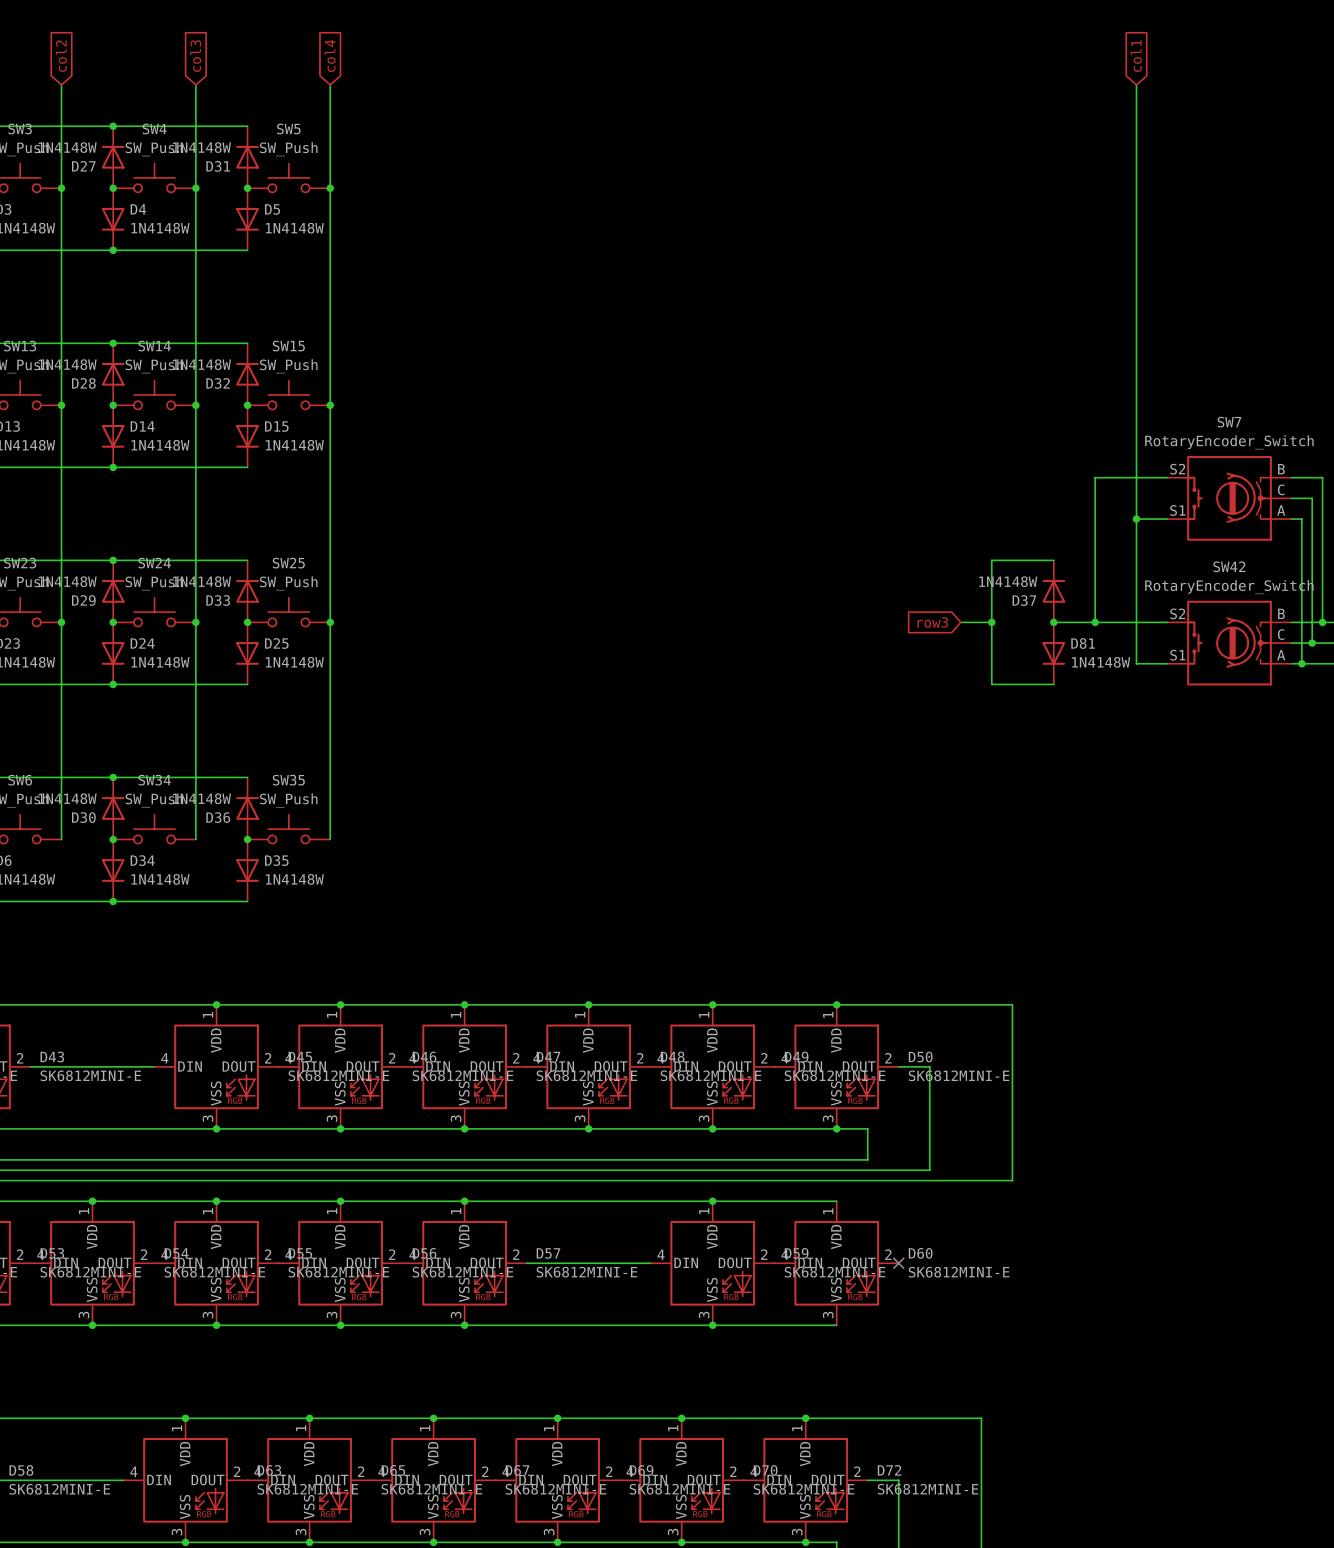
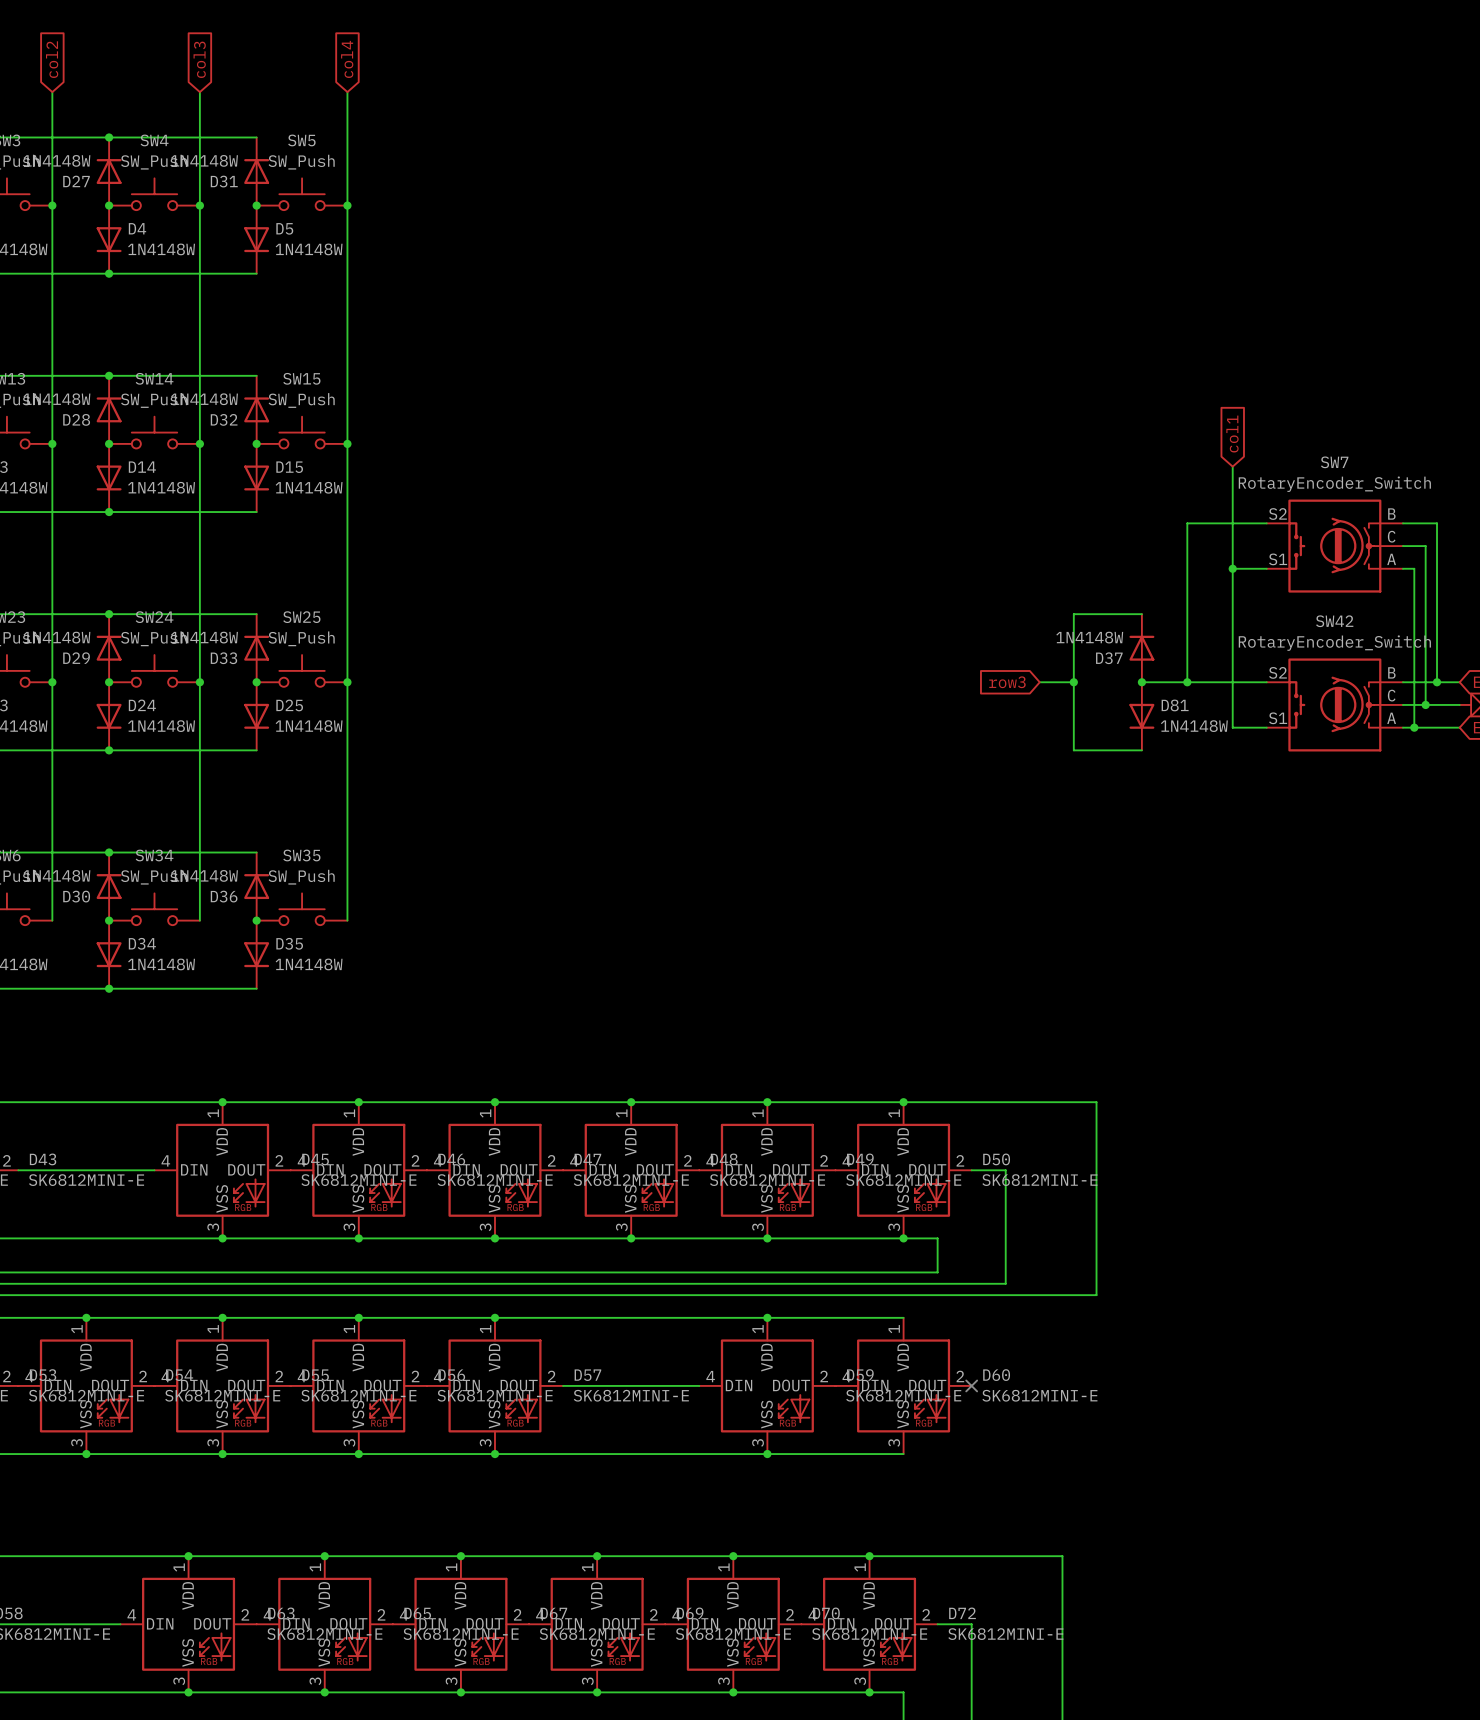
global label: col1 (1136, 56) -> none
wire: (1136, 84) (1136, 426) -> none
global label: none -> col1 (1232, 434)

